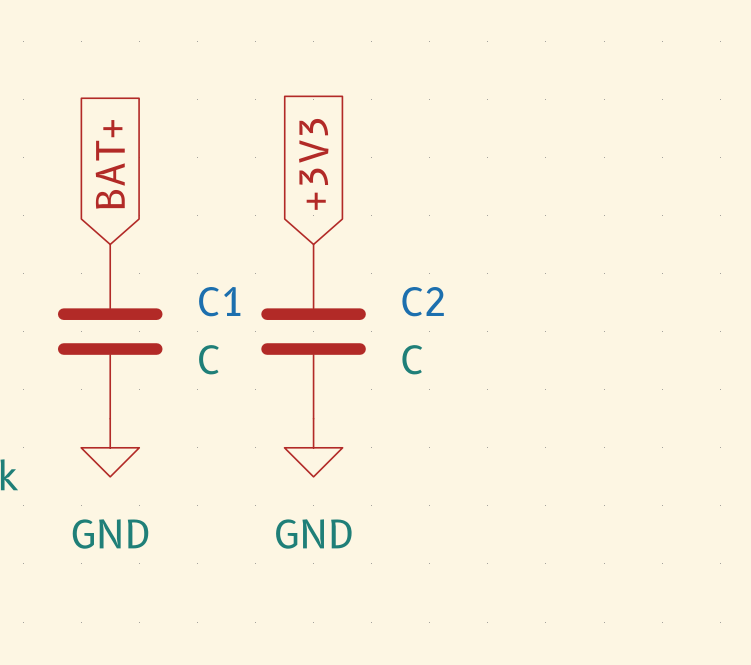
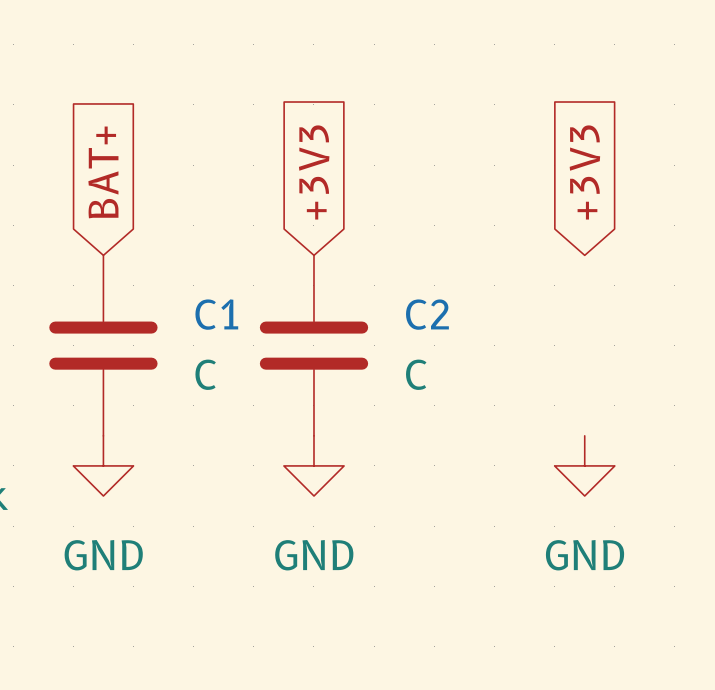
global label: none -> +3V3 (584, 172)
power symbol: none -> GND (584, 465)

